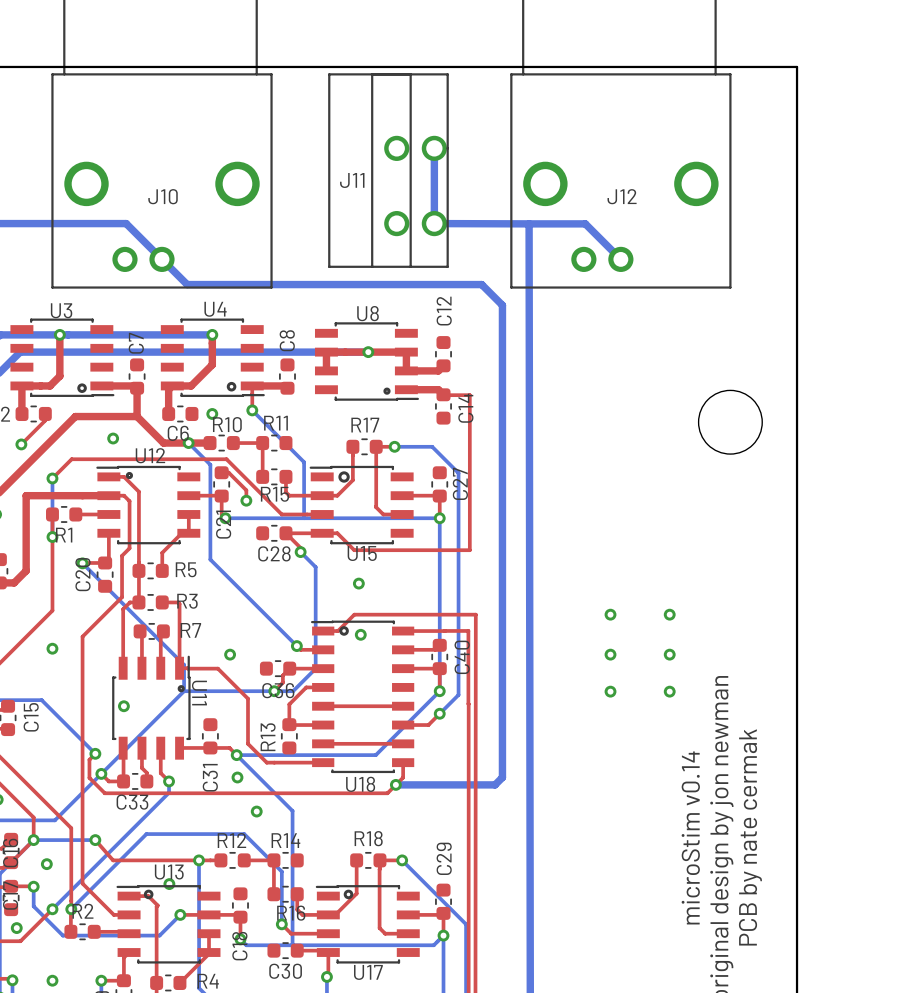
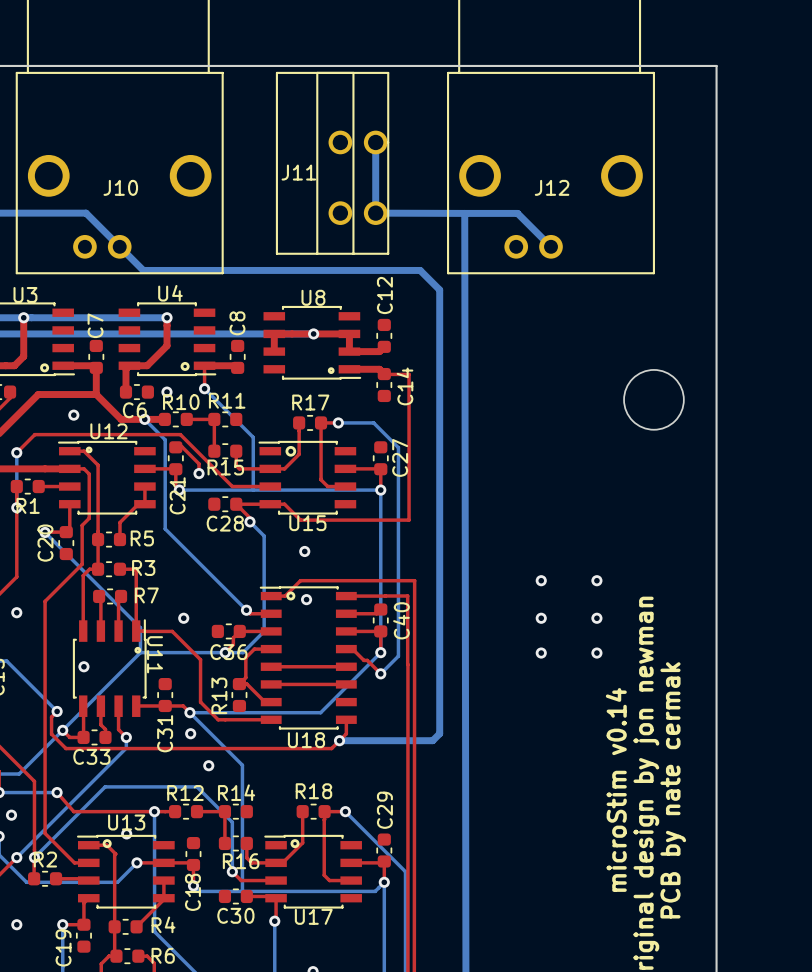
top track: (306, 687) (289, 704) (289, 724) -> (255, 649) (245, 657) (245, 677) (239, 684) (246, 684) (264, 702) (271, 702)
top track: (439, 713) (428, 725) (411, 725) -> (380, 673) (352, 649) (346, 649)
top track: (289, 725) (323, 725) -> (346, 684) (271, 684)
top track: (323, 743) (403, 743) -> none

